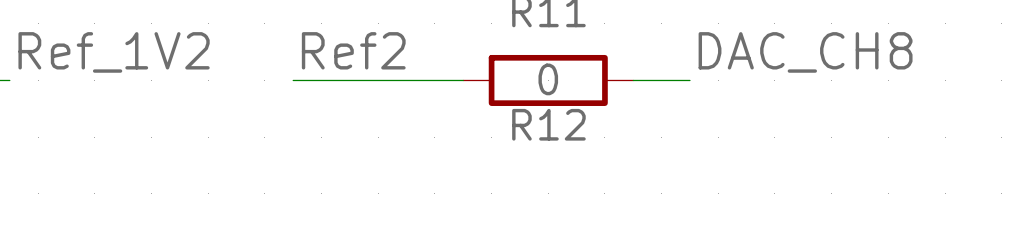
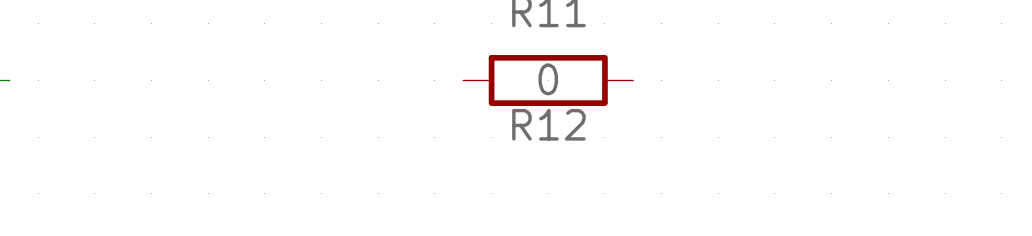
label: Ref2 (353, 50) -> none
label: Ref_1V2 (114, 52) -> none
label: DAC_CH8 (805, 52) -> none
wire: (293, 80) (463, 80) -> none
wire: (633, 80) (689, 80) -> none

